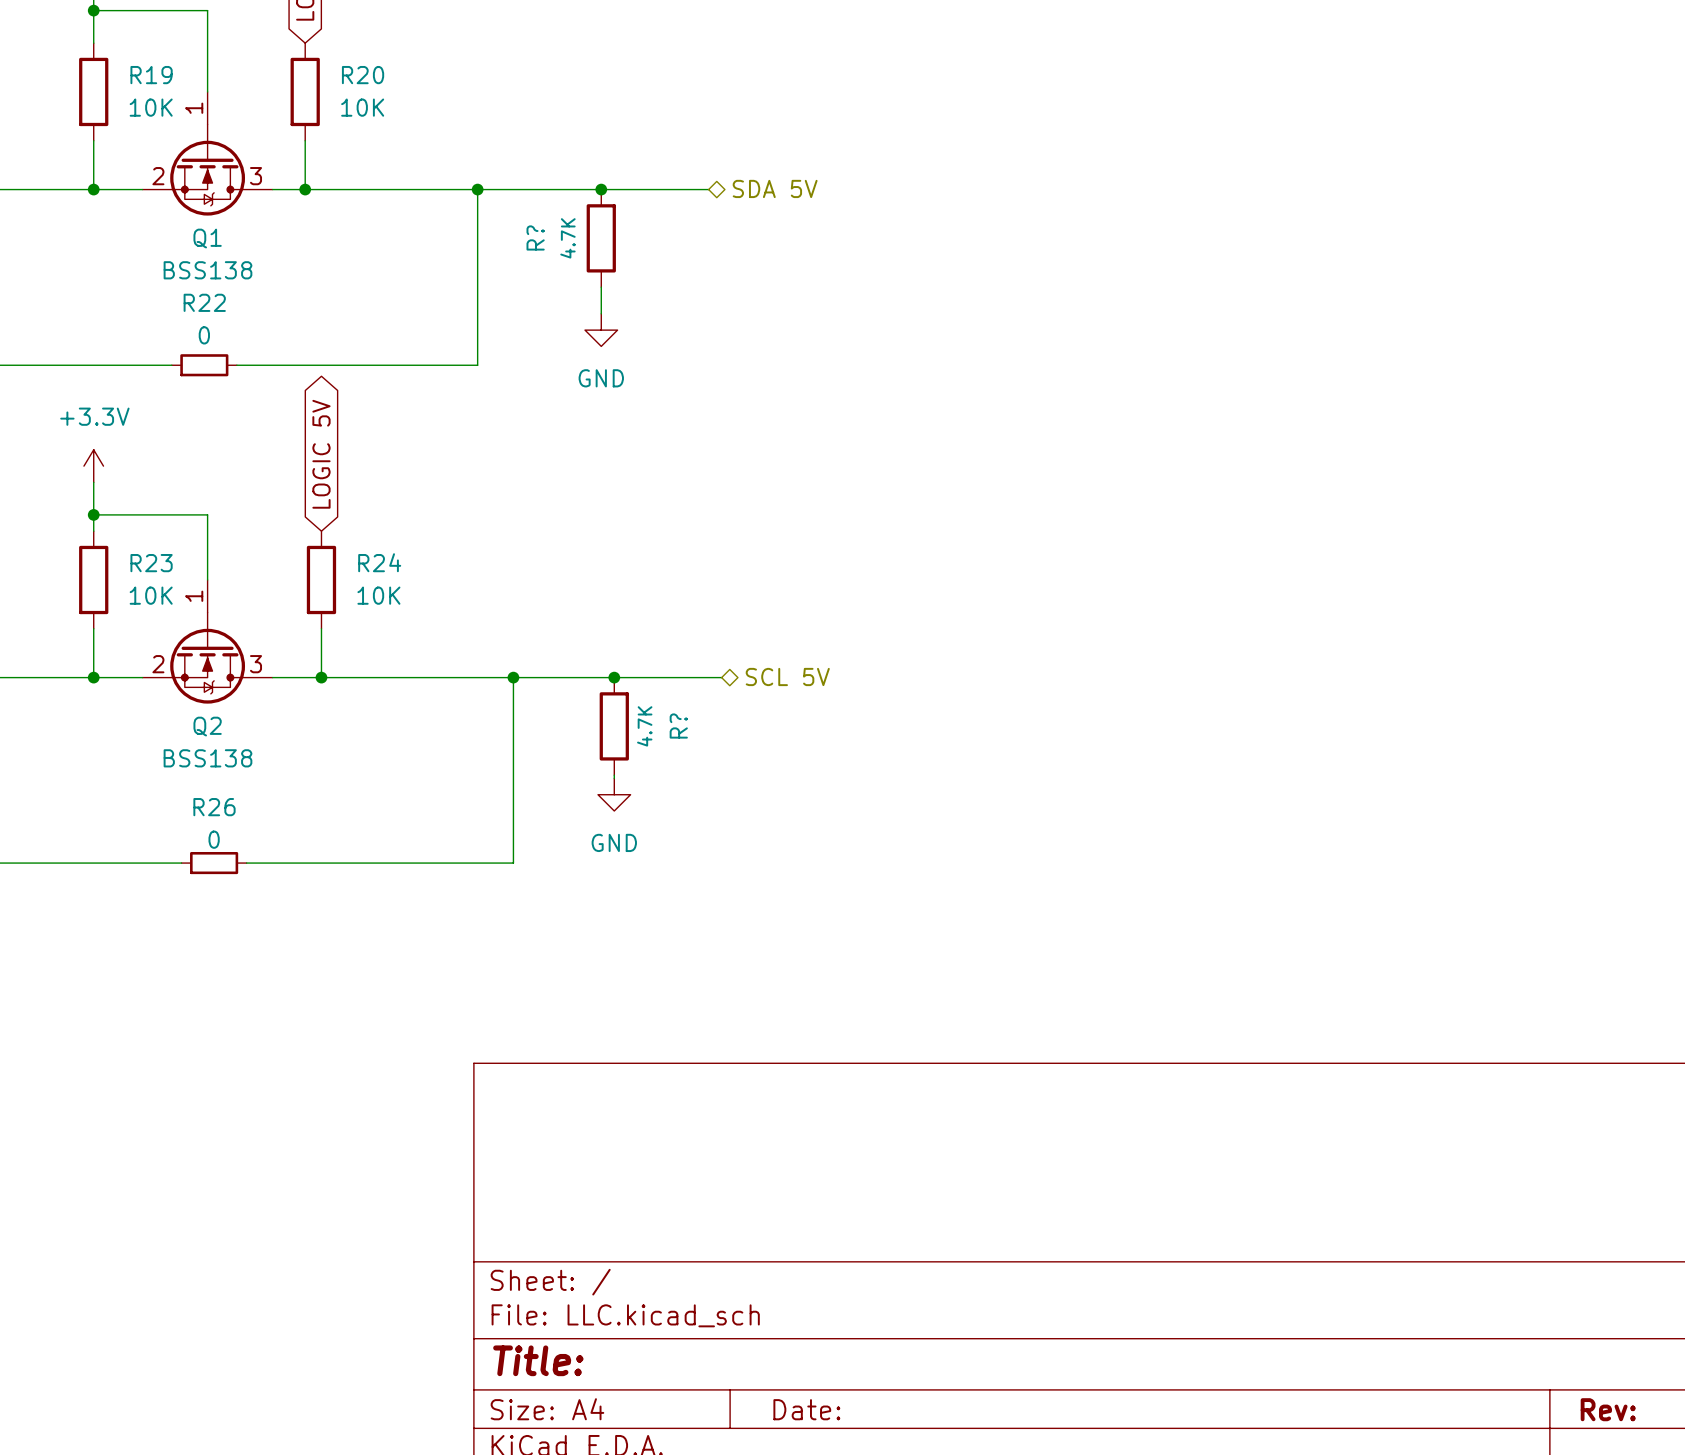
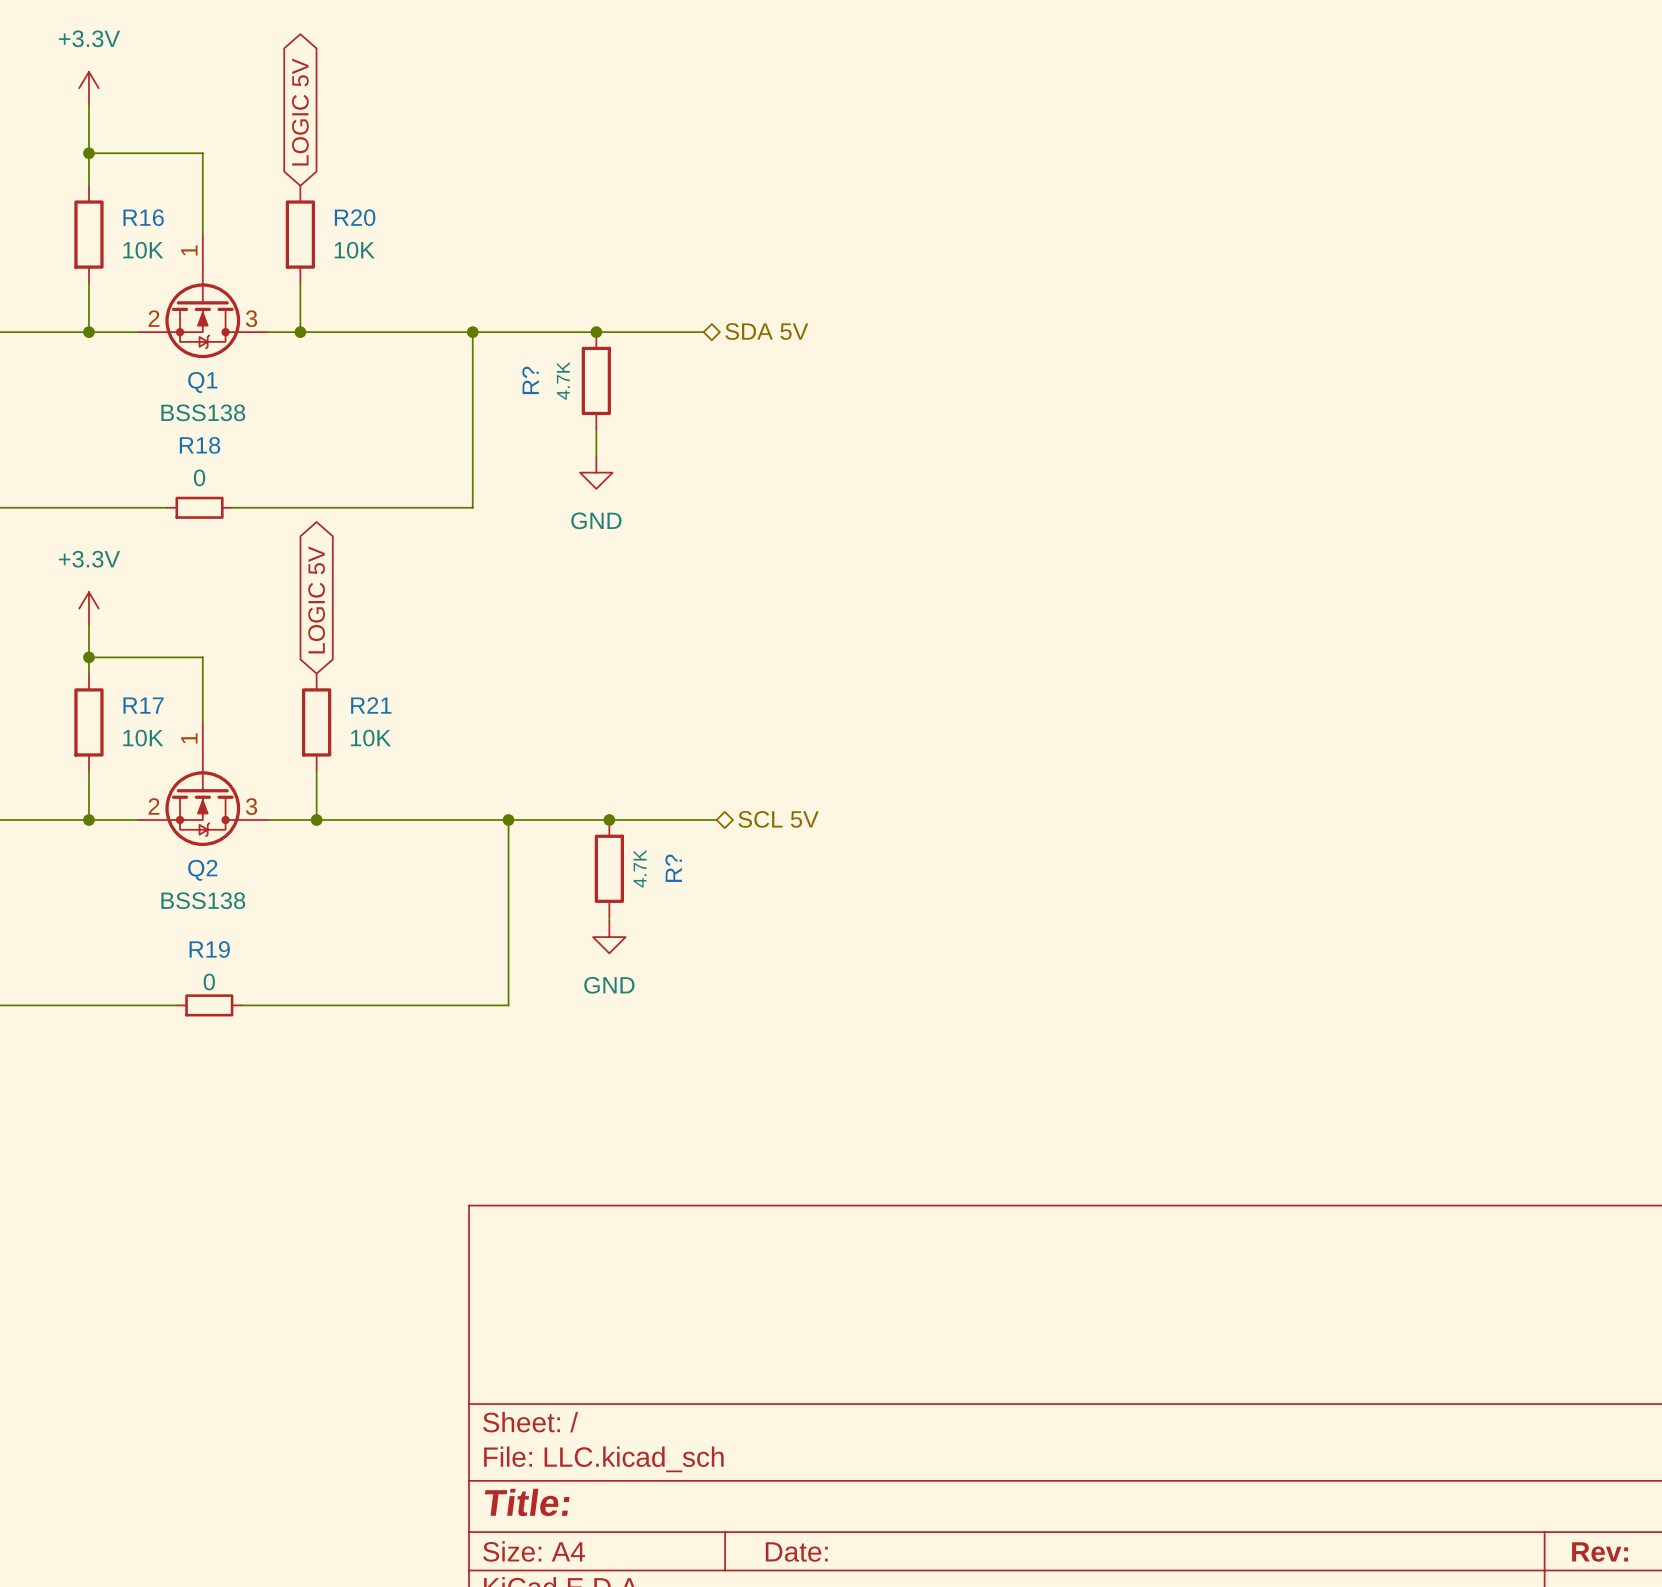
R19 name: R19 (151, 75) -> R16 (143, 217)
R22 name: R22 (204, 302) -> R18 (200, 445)
R24 name: R24 (379, 562) -> R21 (371, 705)
R23 name: R23 (151, 563) -> R17 (143, 705)
R26 name: R26 (214, 807) -> R19 (209, 949)

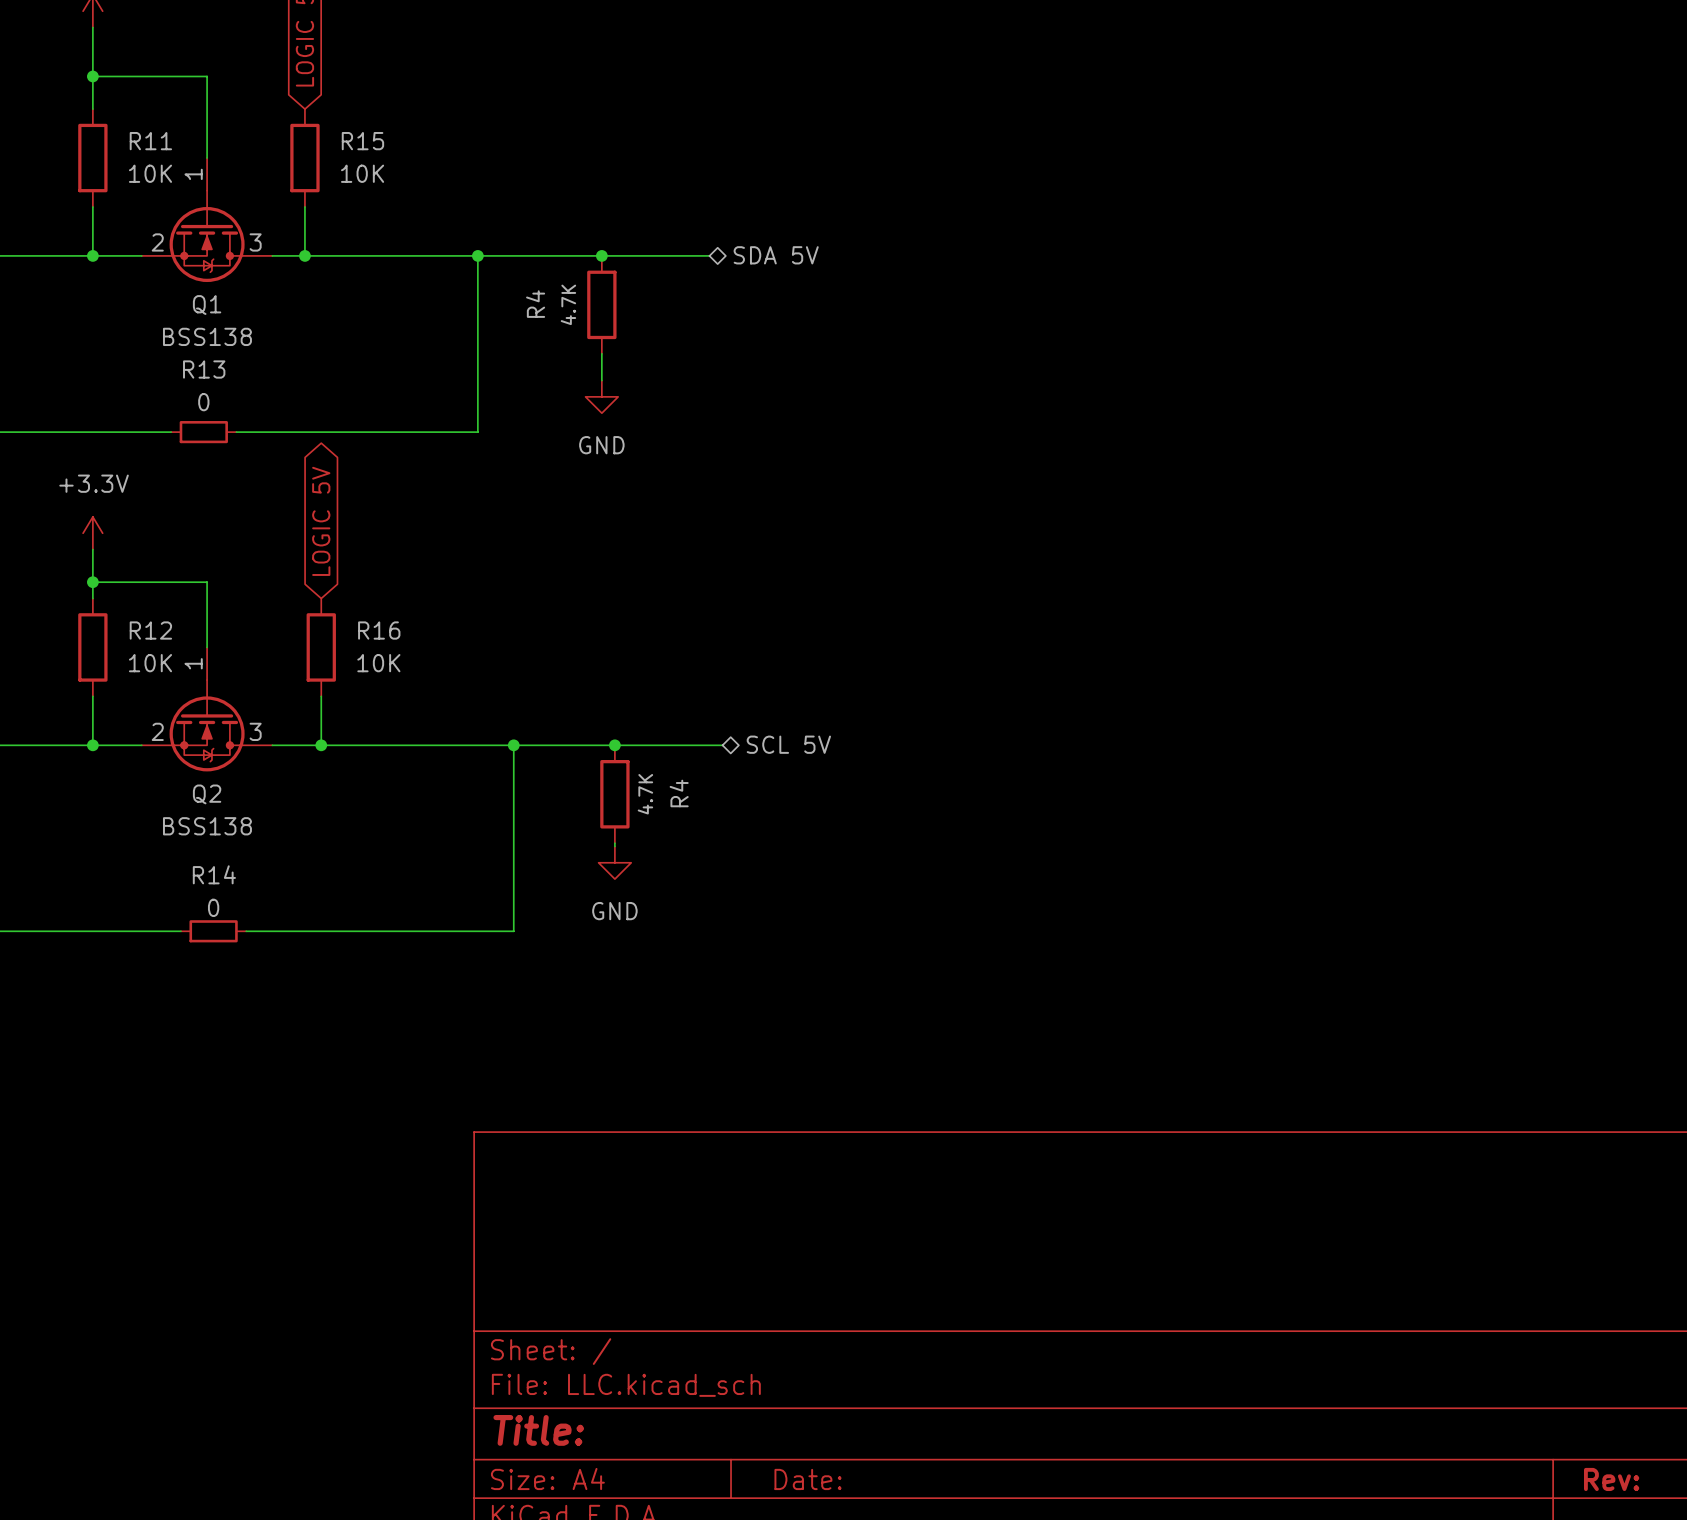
R16 name: R16 (143, 217) -> R11 (150, 141)
R20 name: R20 (355, 217) -> R15 (362, 141)
R? name: R? (530, 380) -> R4 (535, 304)
R18 name: R18 (200, 445) -> R13 (204, 369)
R17 name: R17 (143, 705) -> R12 (150, 630)
R21 name: R21 (371, 705) -> R16 (379, 630)
R? name: R? (673, 868) -> R4 (679, 793)
R19 name: R19 (209, 949) -> R14 (214, 874)

